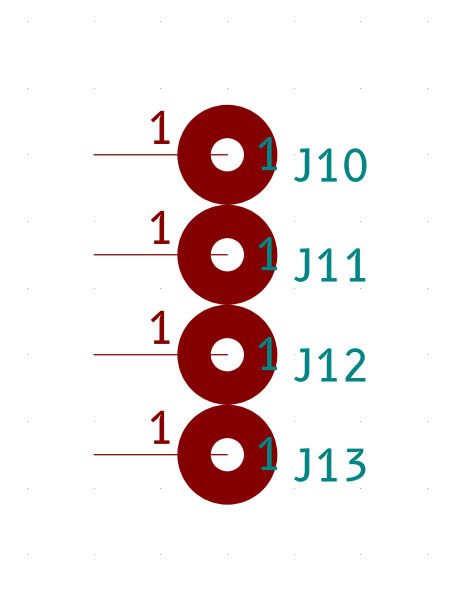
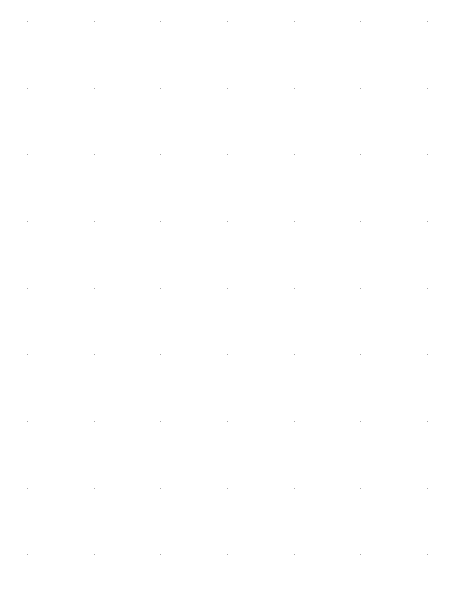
J10: (185, 154) -> none
J11: (185, 254) -> none
J12: (185, 354) -> none
J13: (185, 454) -> none

